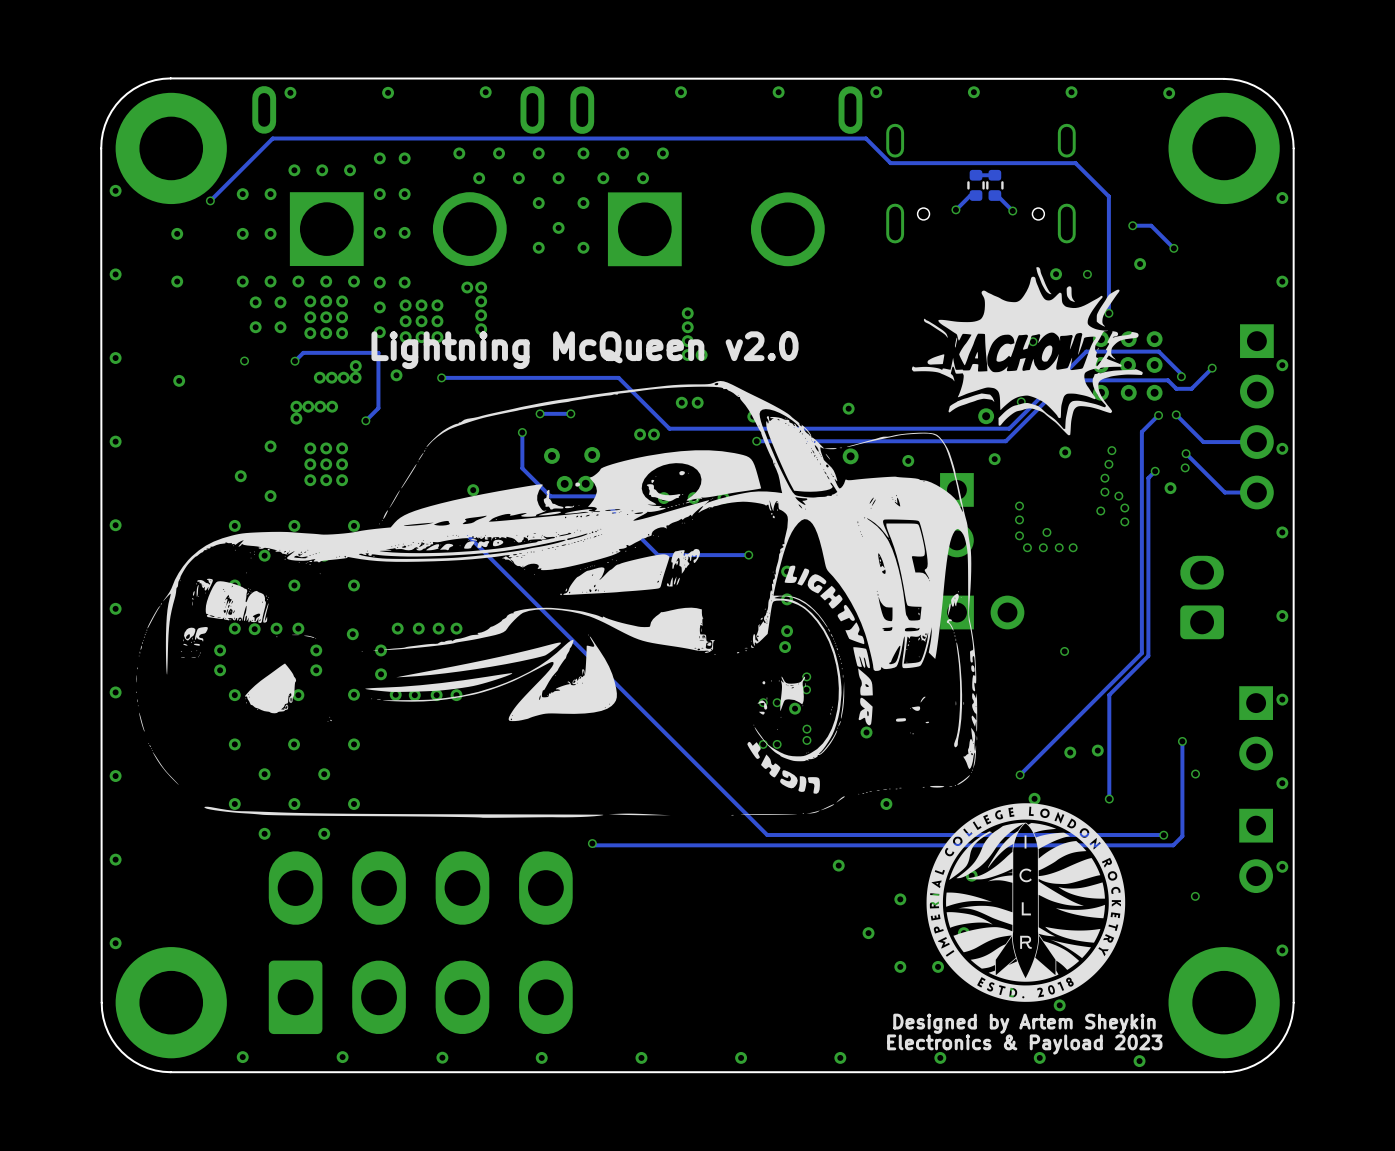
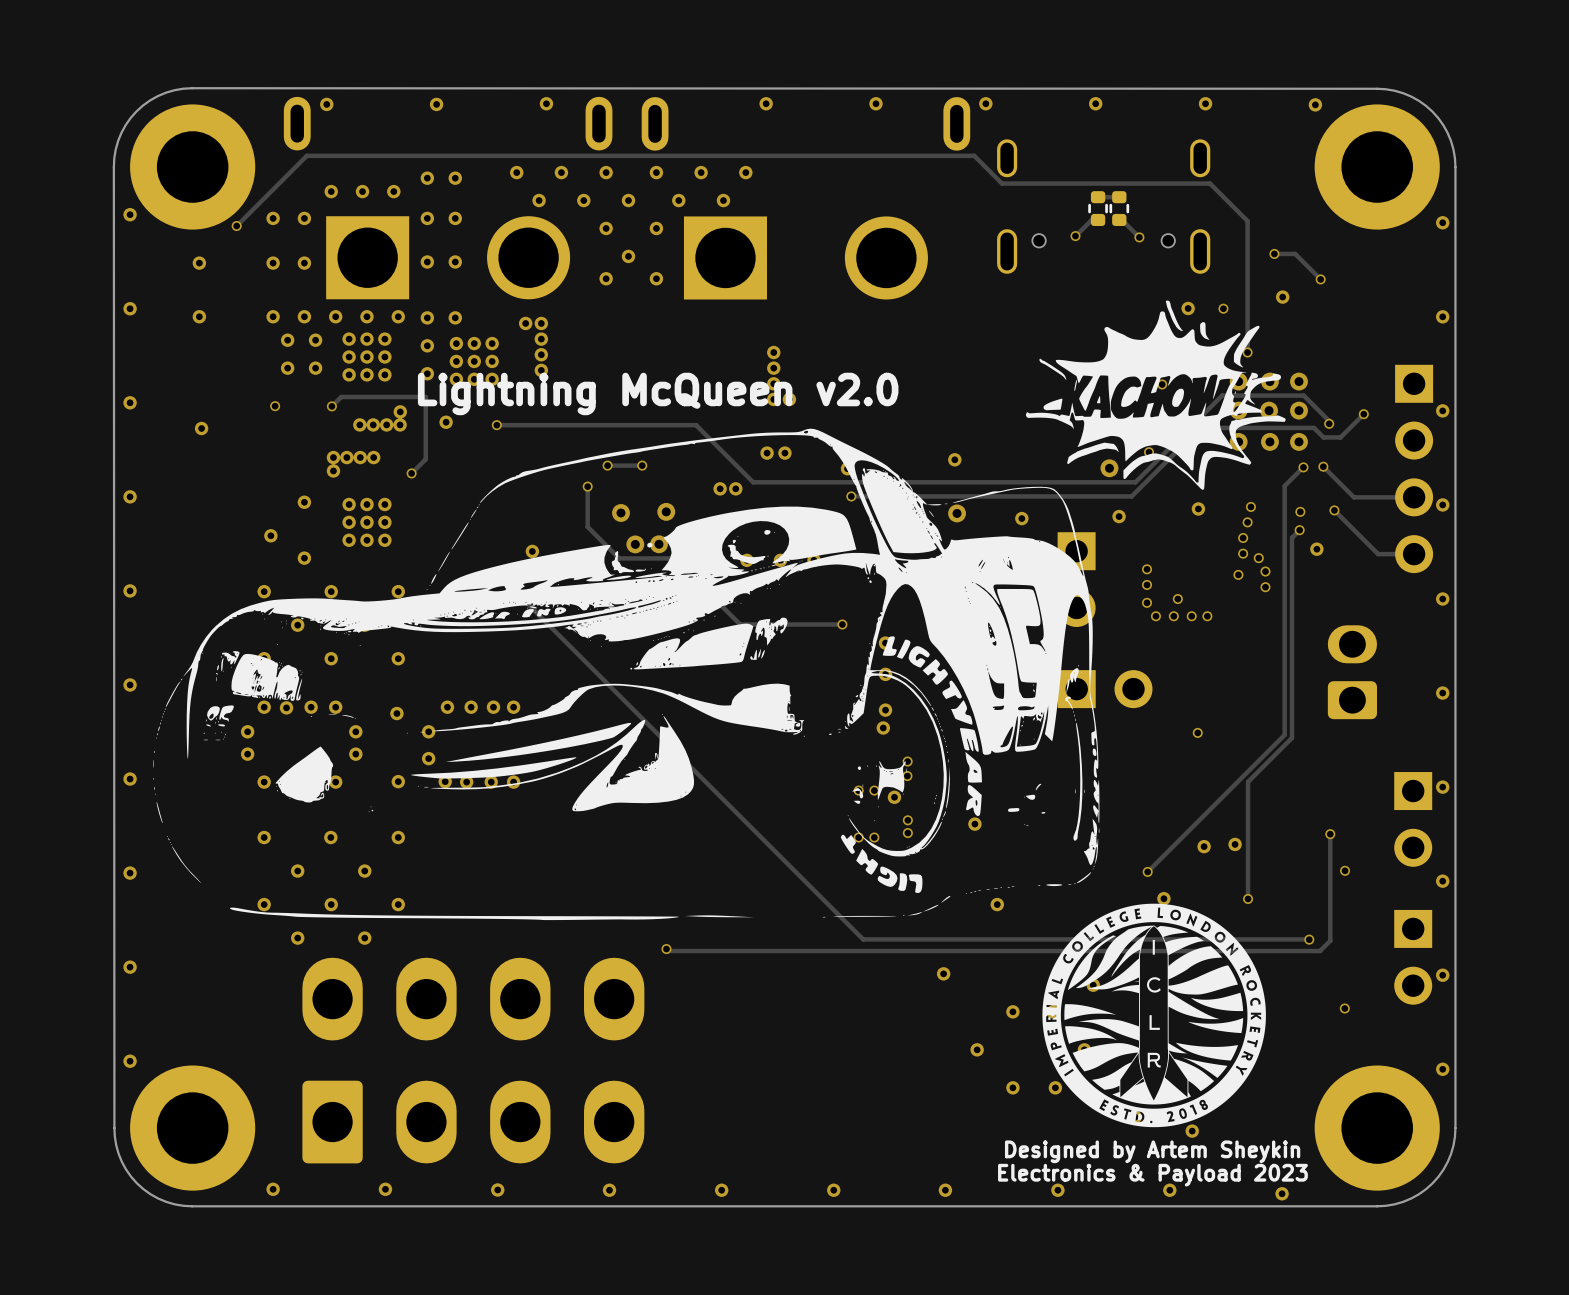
via position: (1185, 467) -> (1300, 511)

